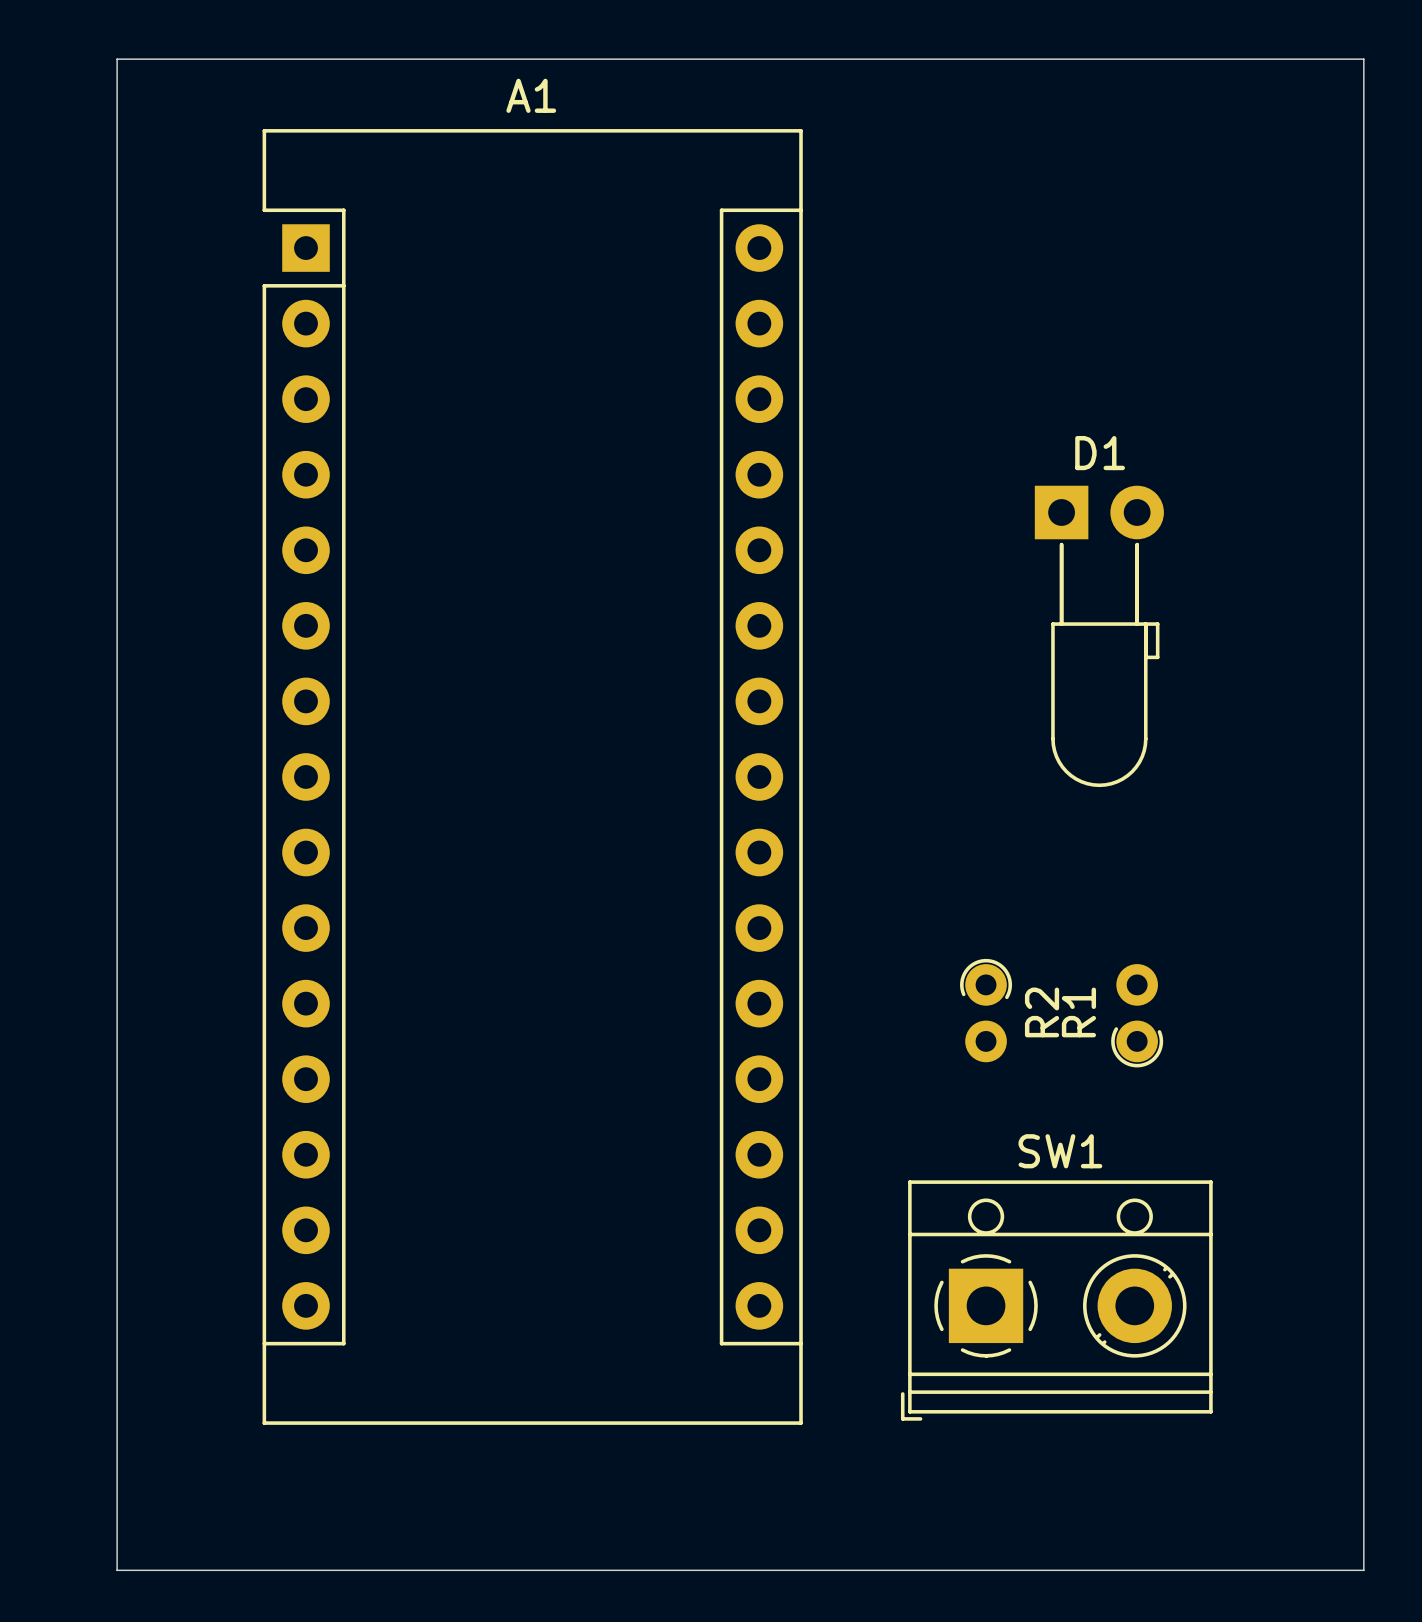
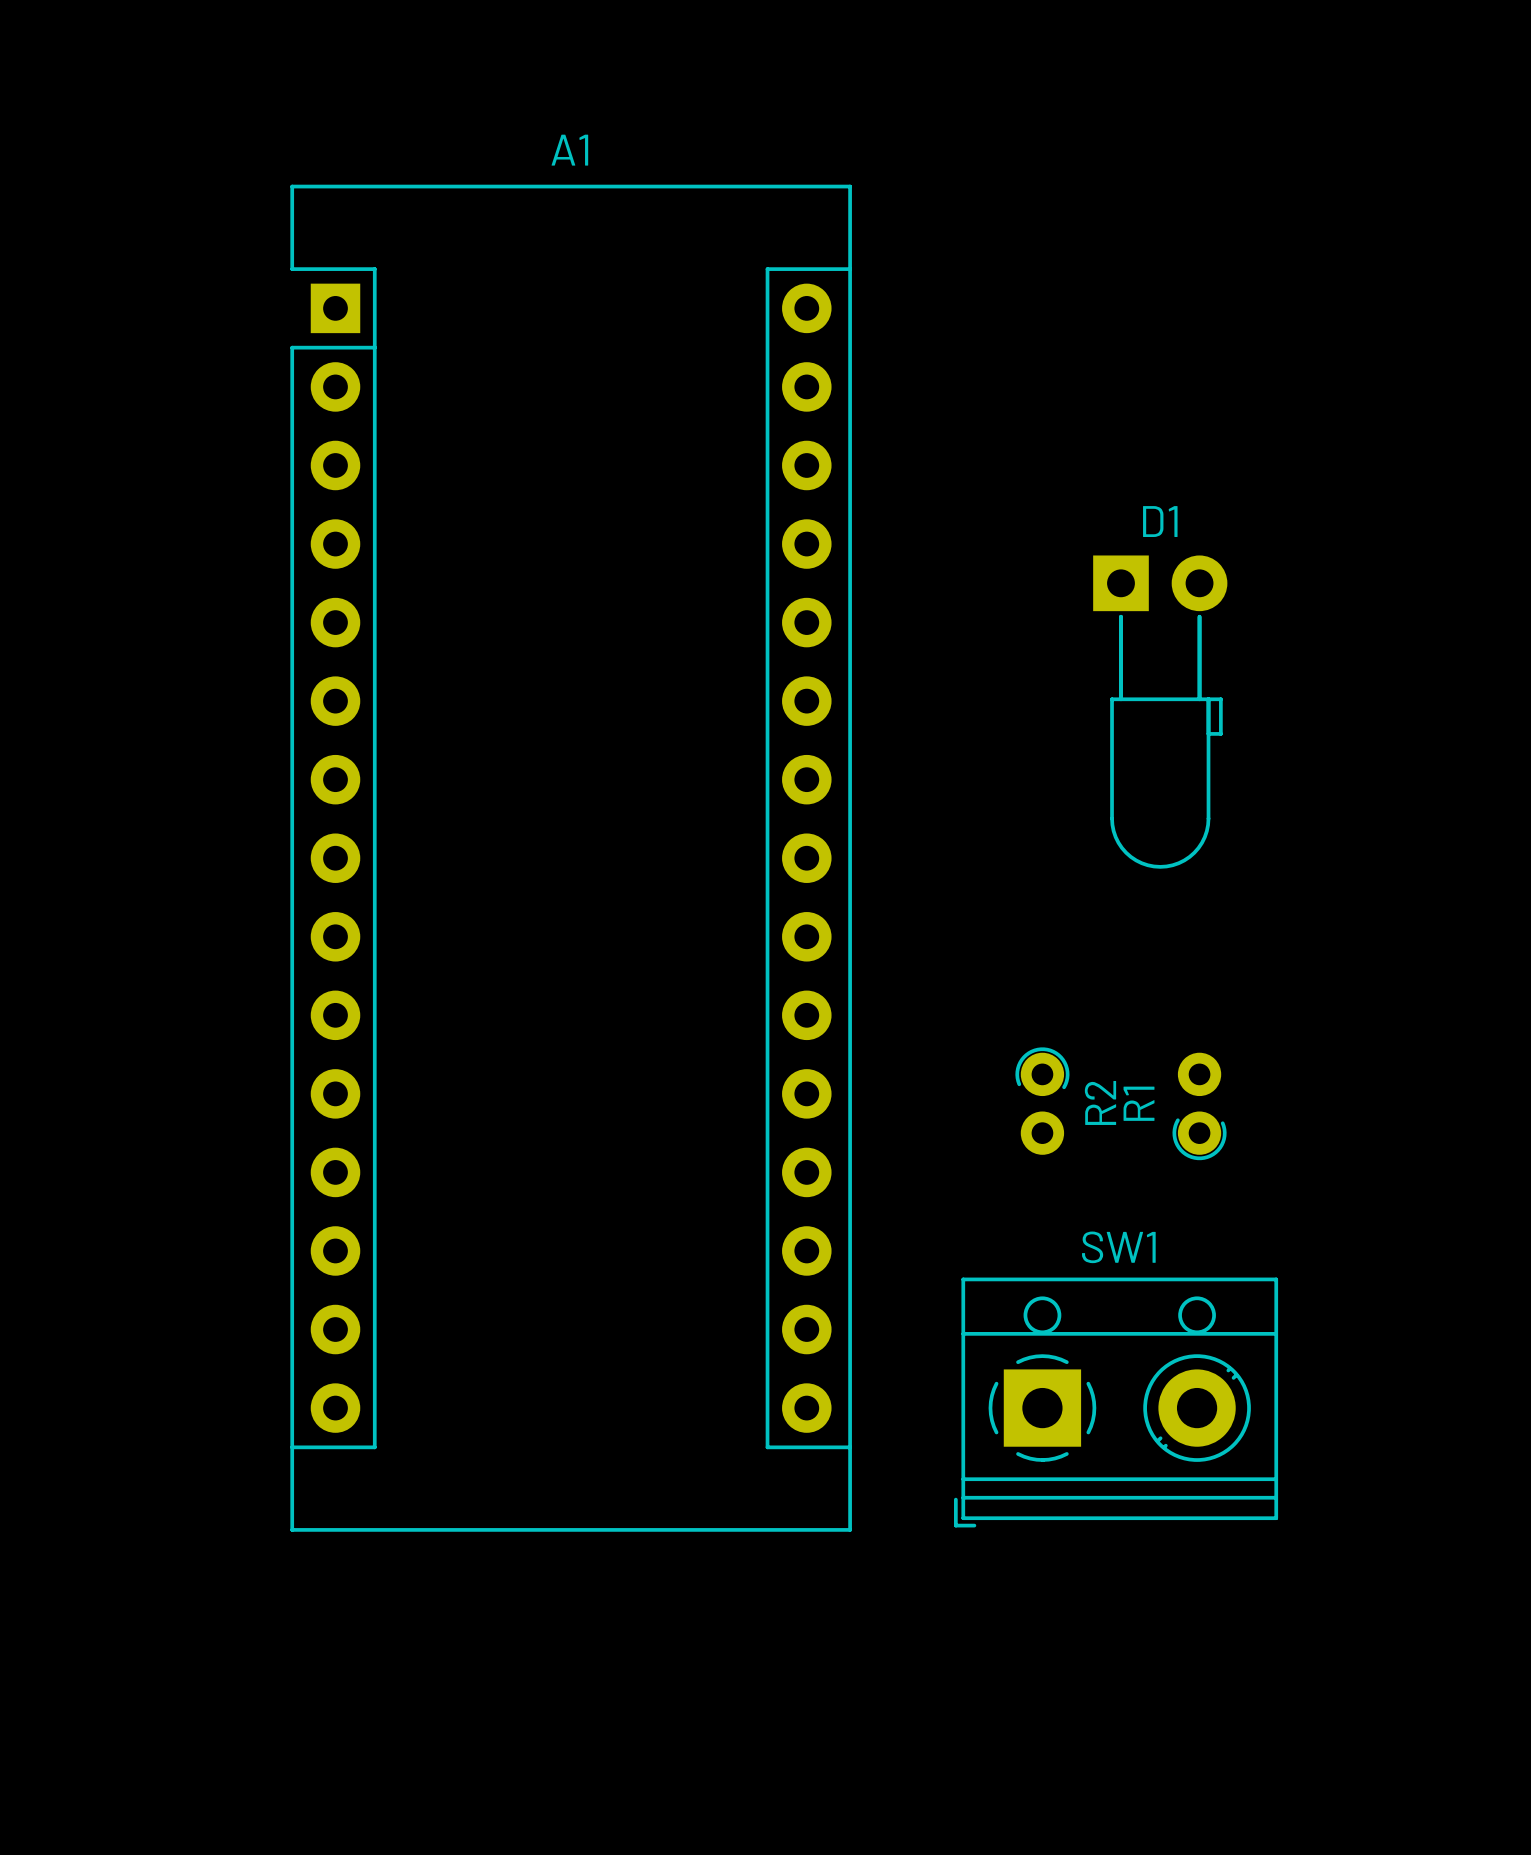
board edge: (117, 59) (1363, 59) (1363, 1570) (117, 1570) (117, 59) -> none

